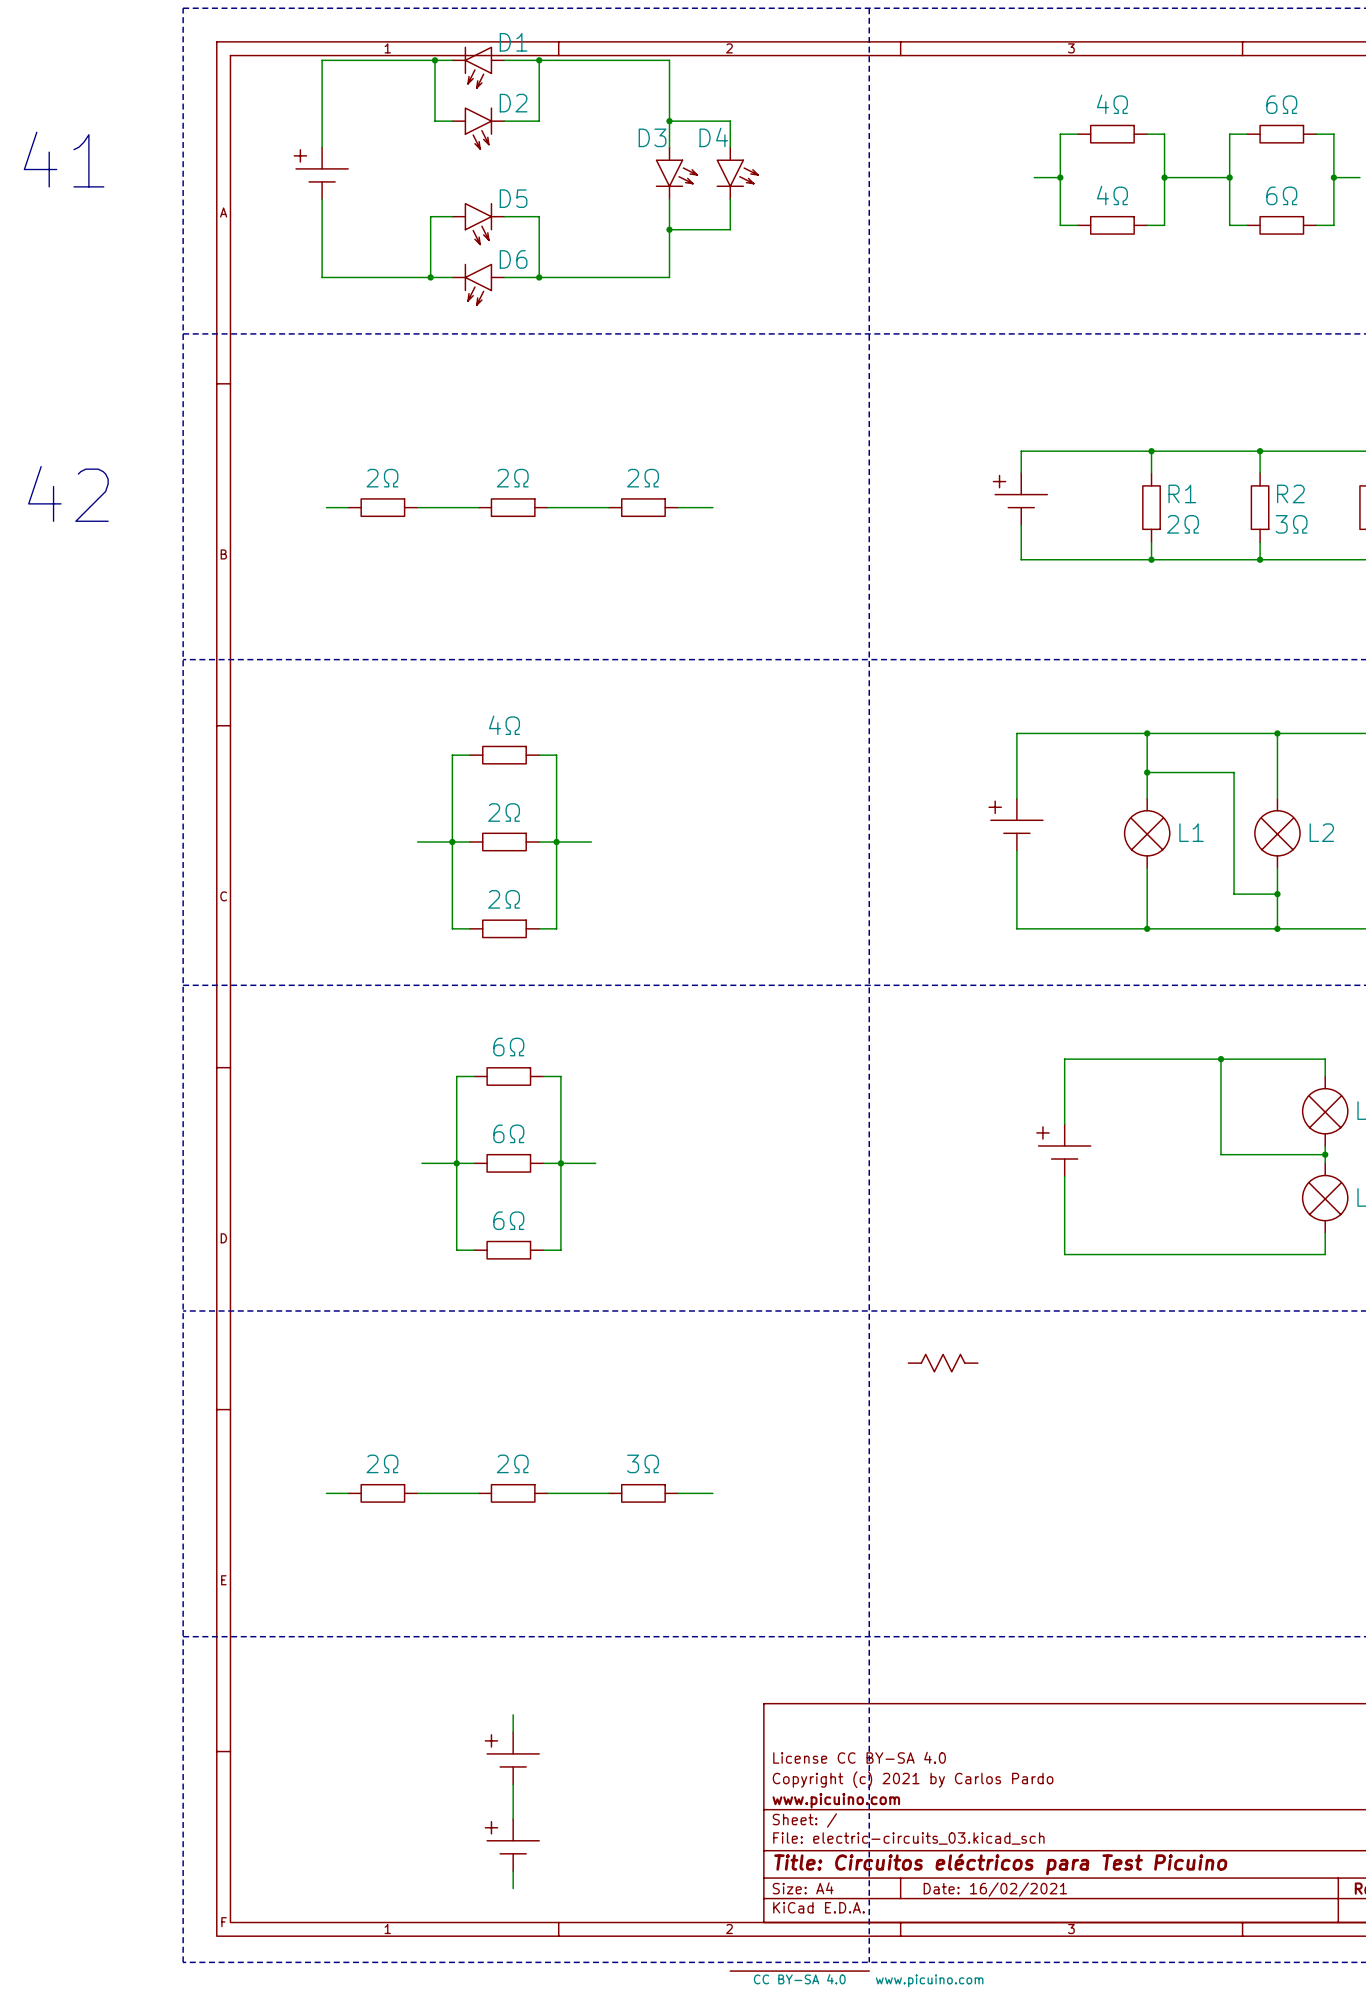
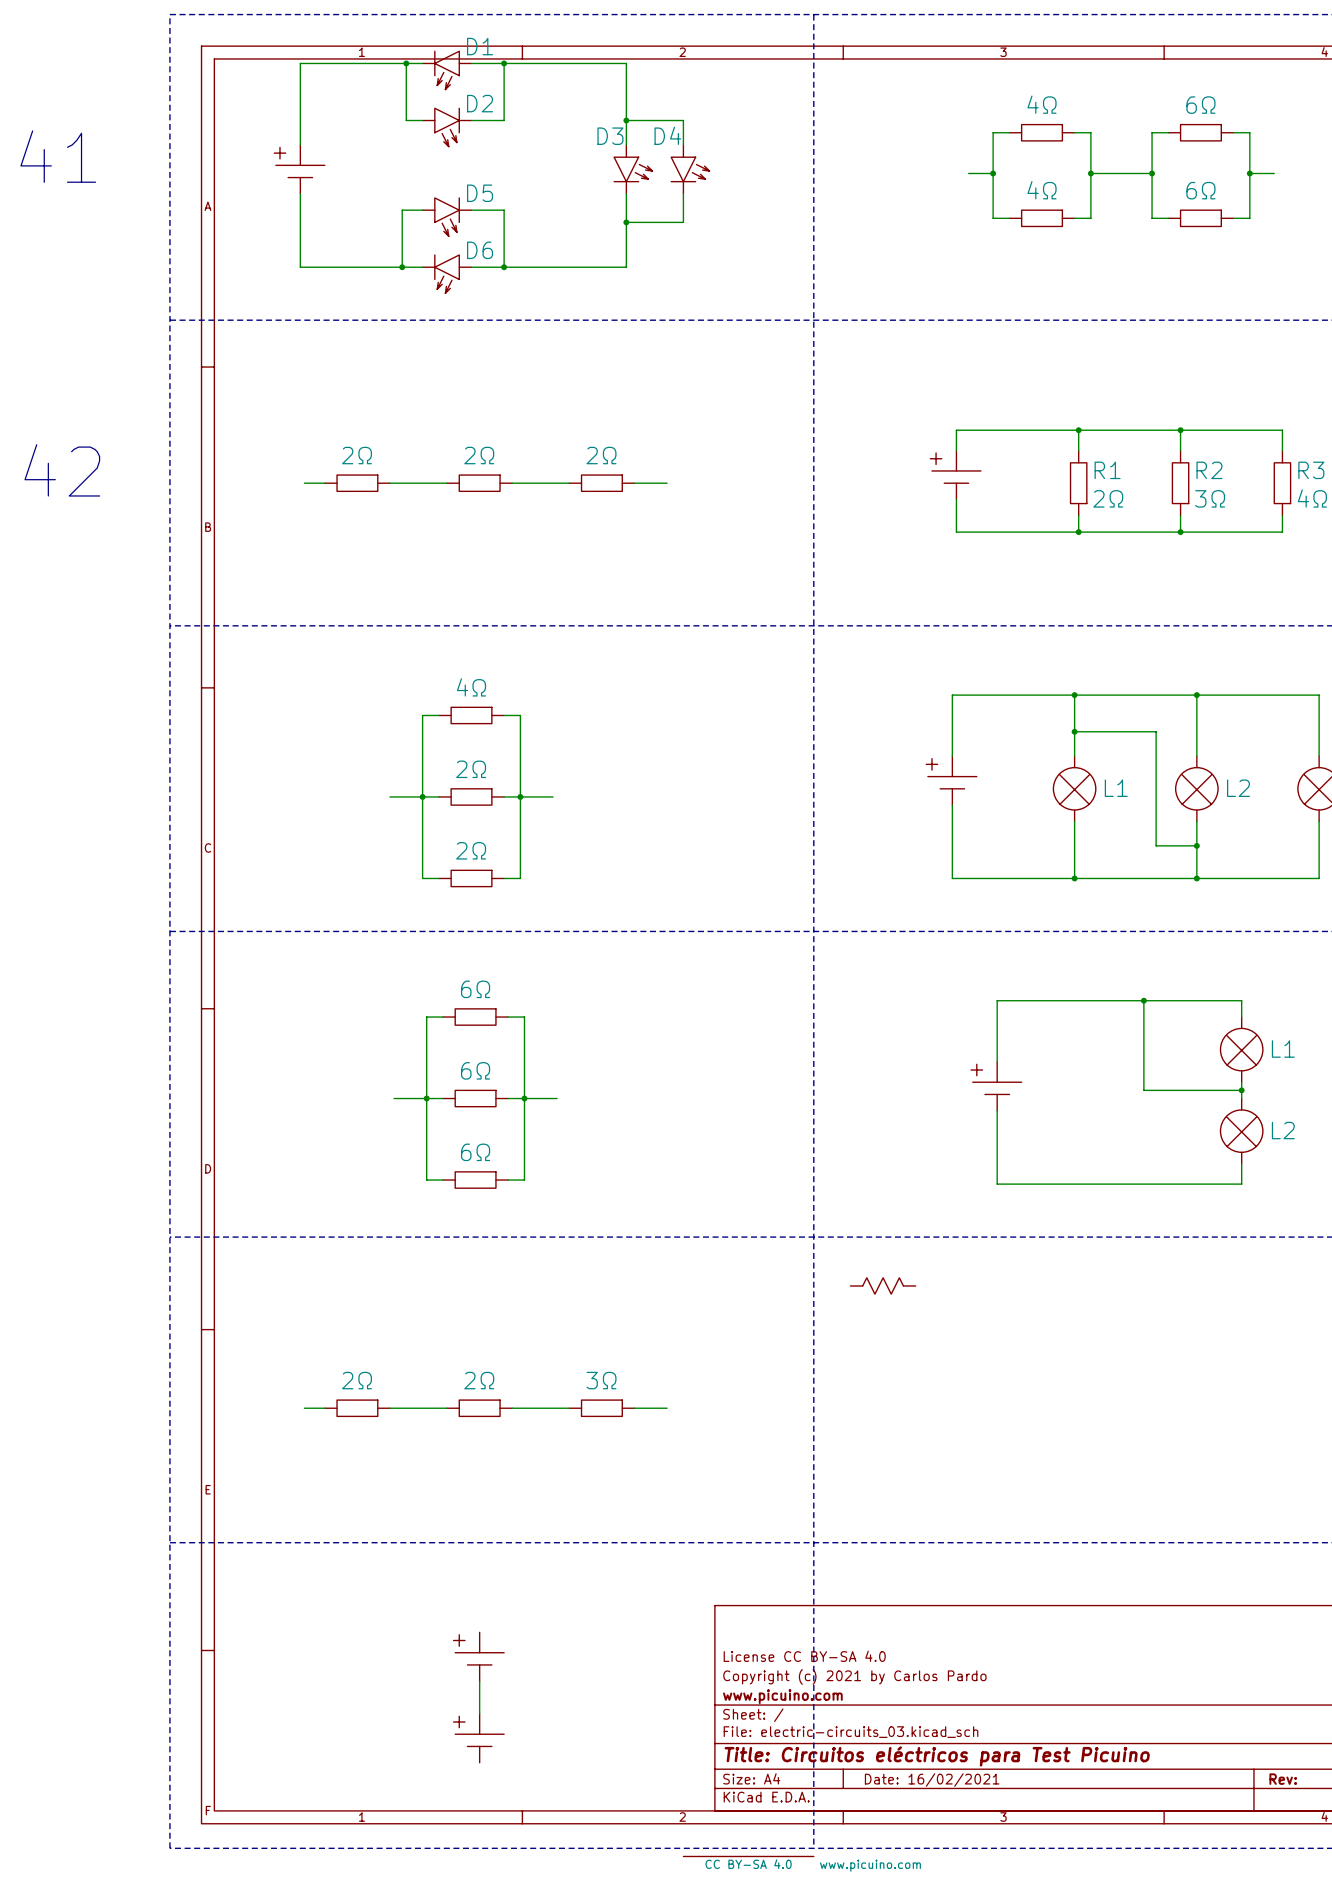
wire: (513, 1714) (513, 1732) -> none
wire: (513, 1871) (513, 1888) -> none

